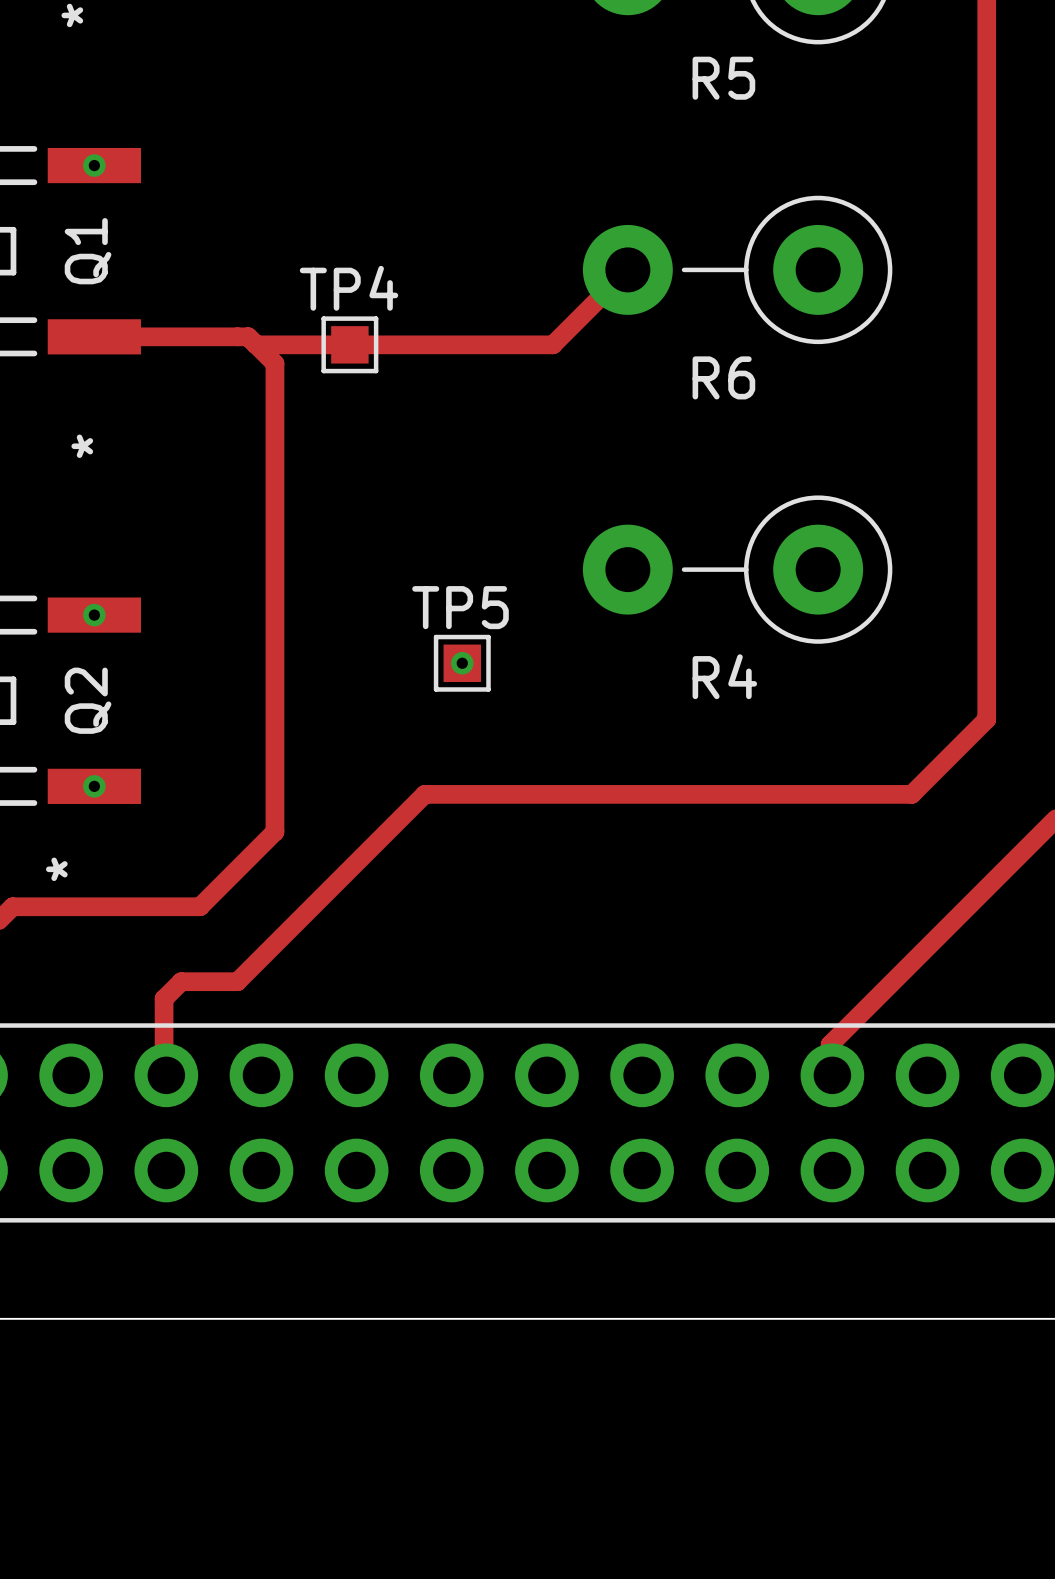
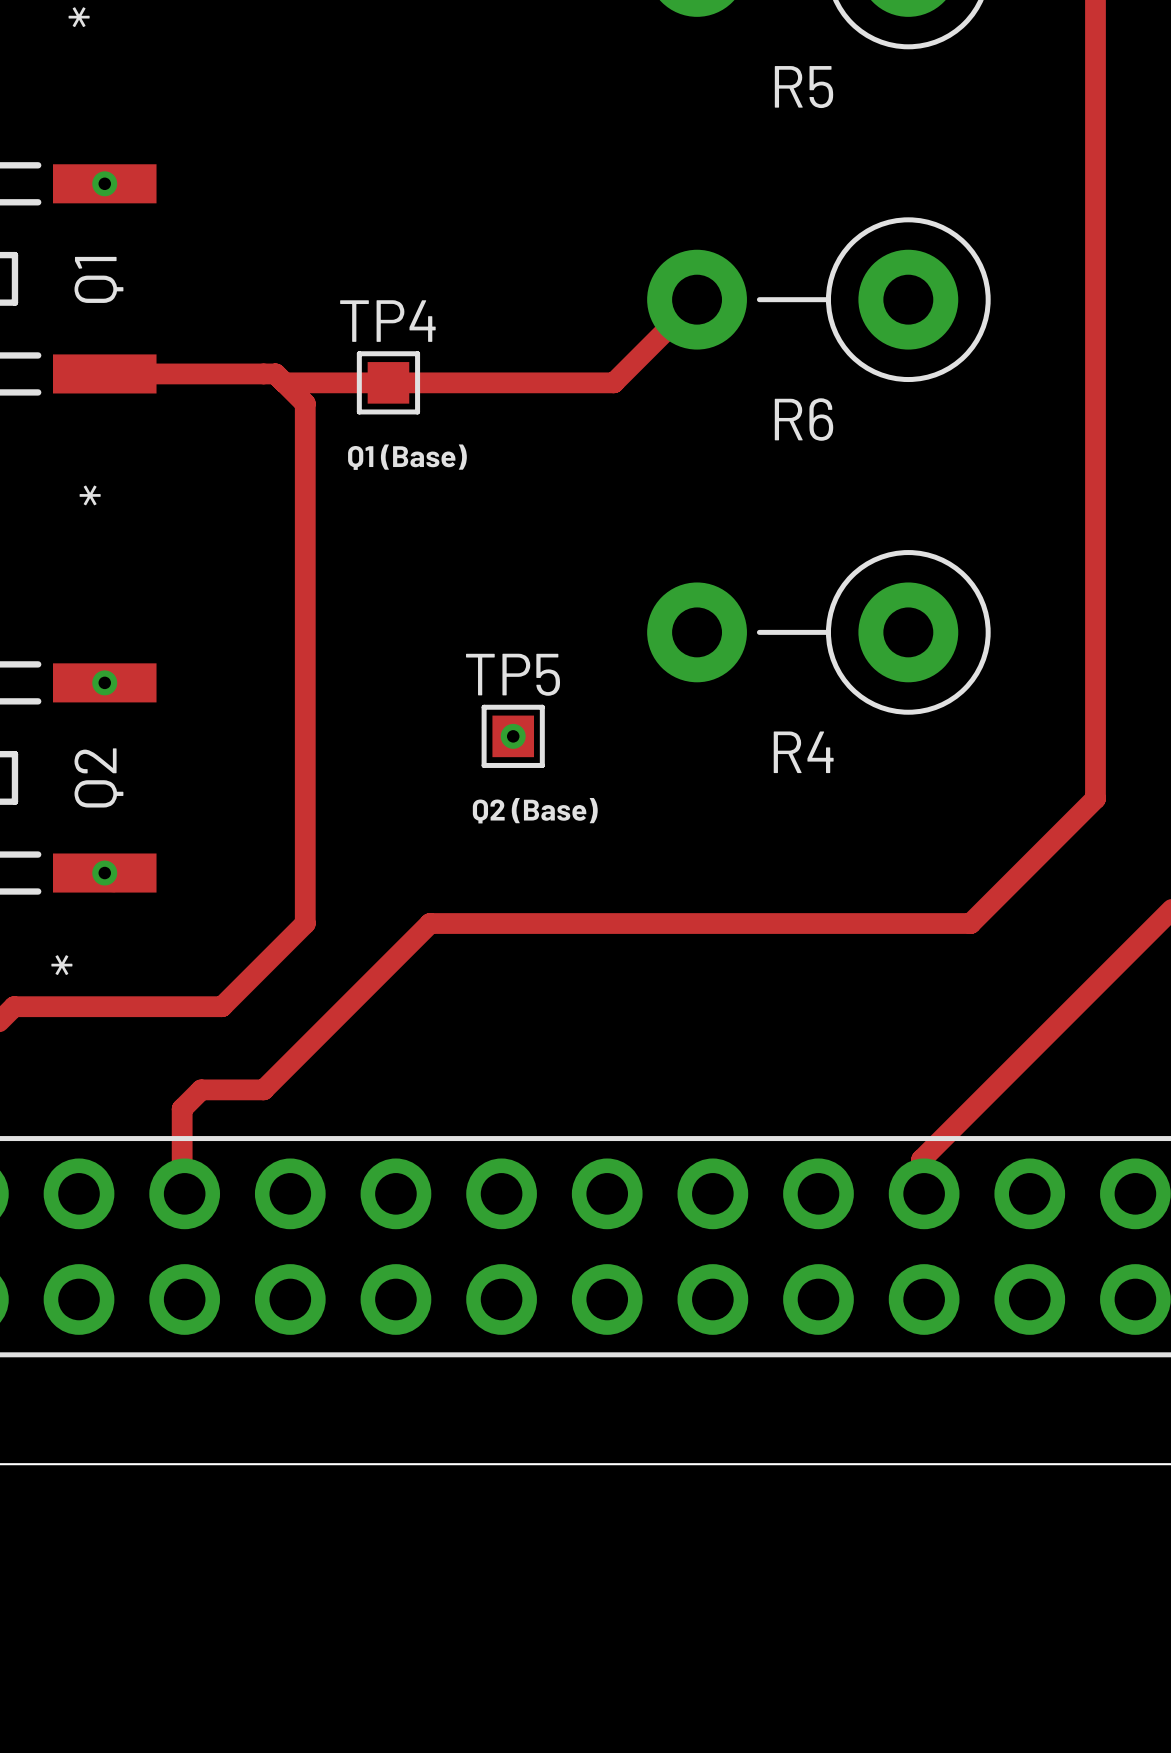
text: none -> Q1 (Base) (407, 457)
text: none -> Q2 (Base) (535, 810)
track: (911, 794) (424, 794) (387, 831) -> (1012, 881) (970, 923) (430, 923)

